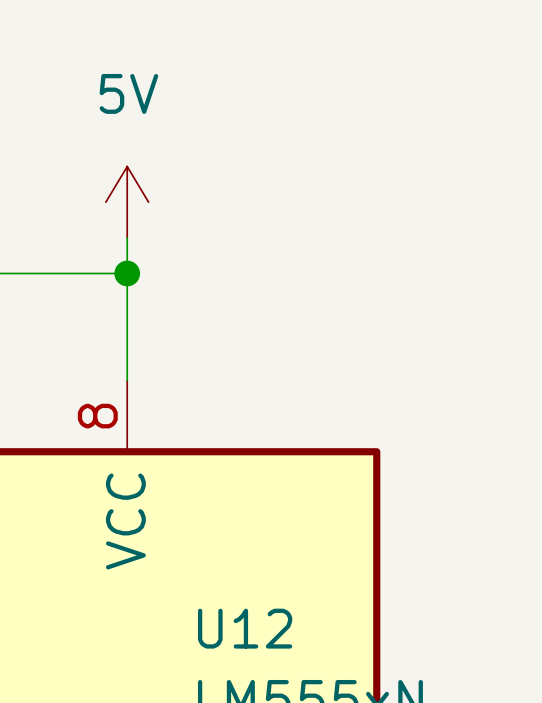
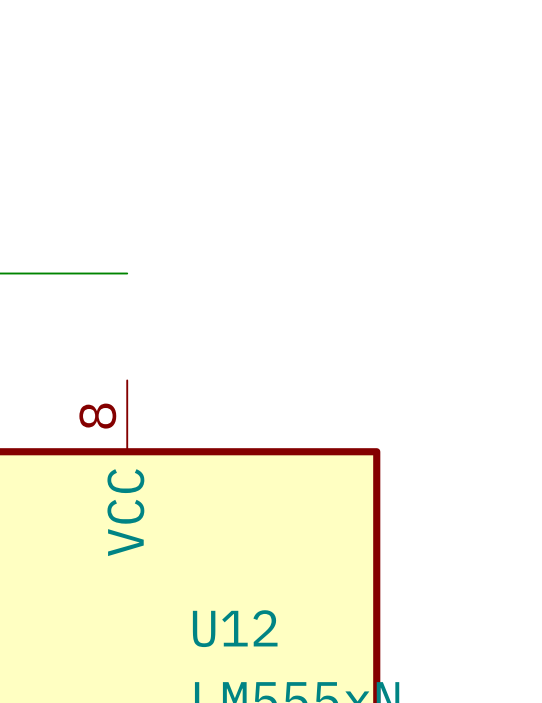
power symbol: 5V (127, 202) -> none
wire: (127, 237) (127, 380) -> none
junction: (127, 273) -> none

